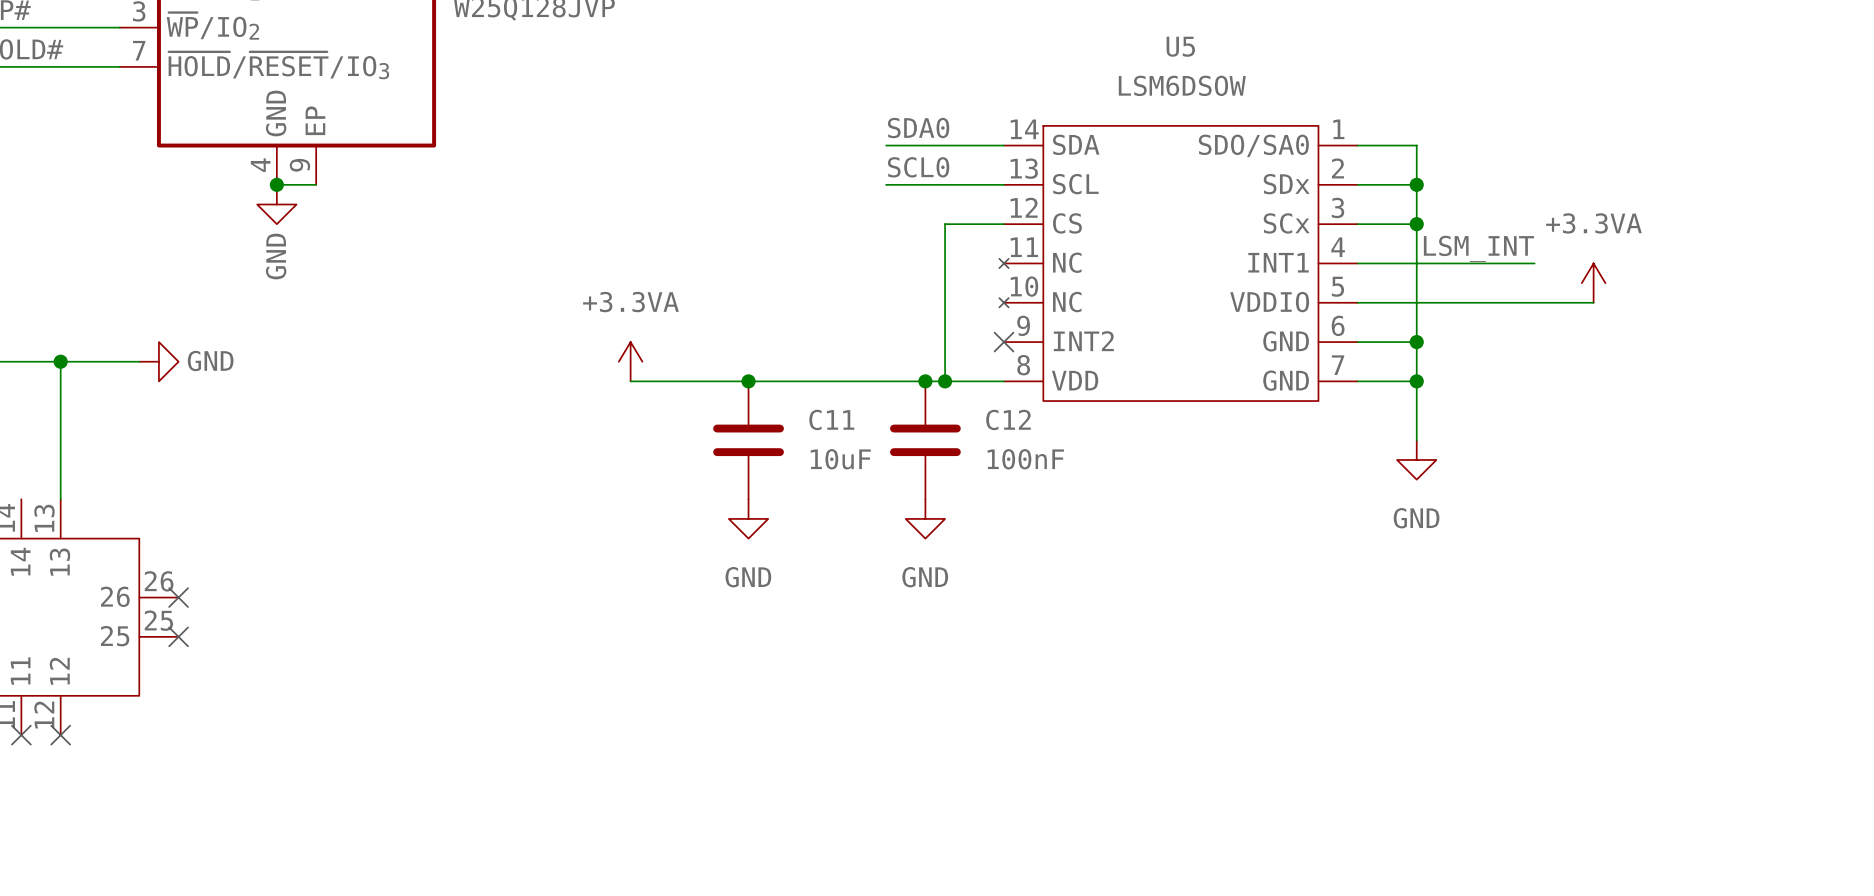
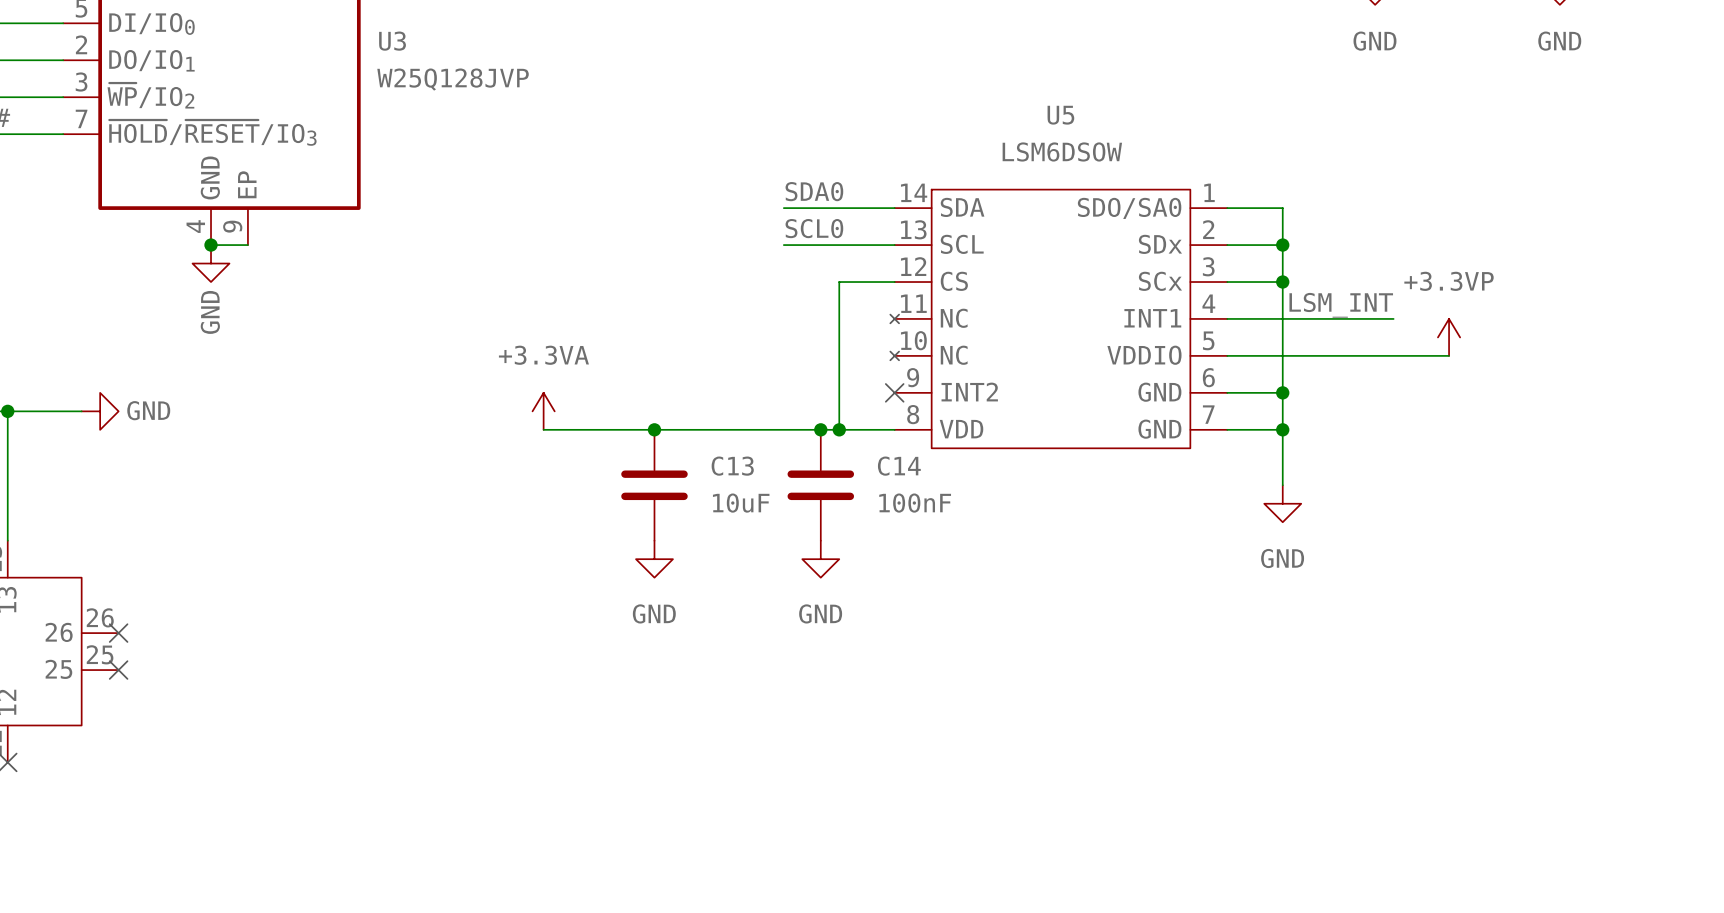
power symbol: +3.3VA (1593, 283) -> +3.3VP (1449, 337)
C11 name: C11 (831, 419) -> C13 (732, 466)
C12 name: C12 (1008, 419) -> C14 (899, 466)

